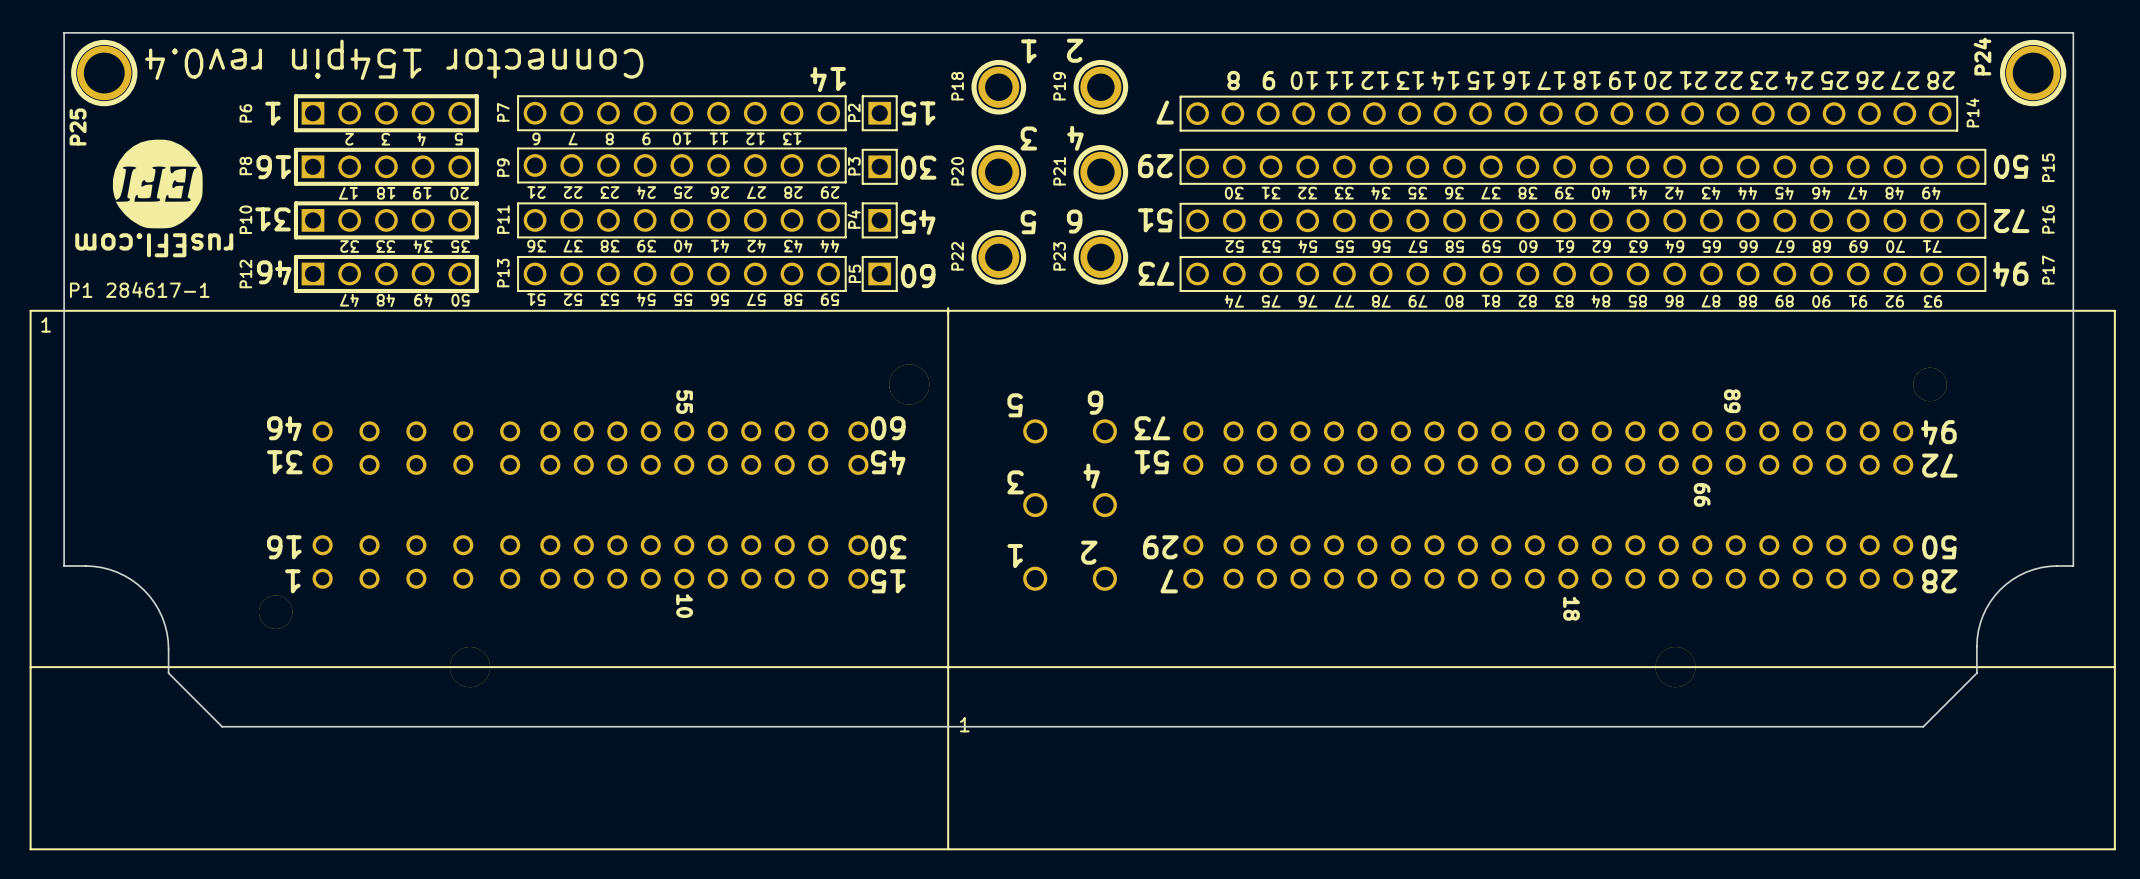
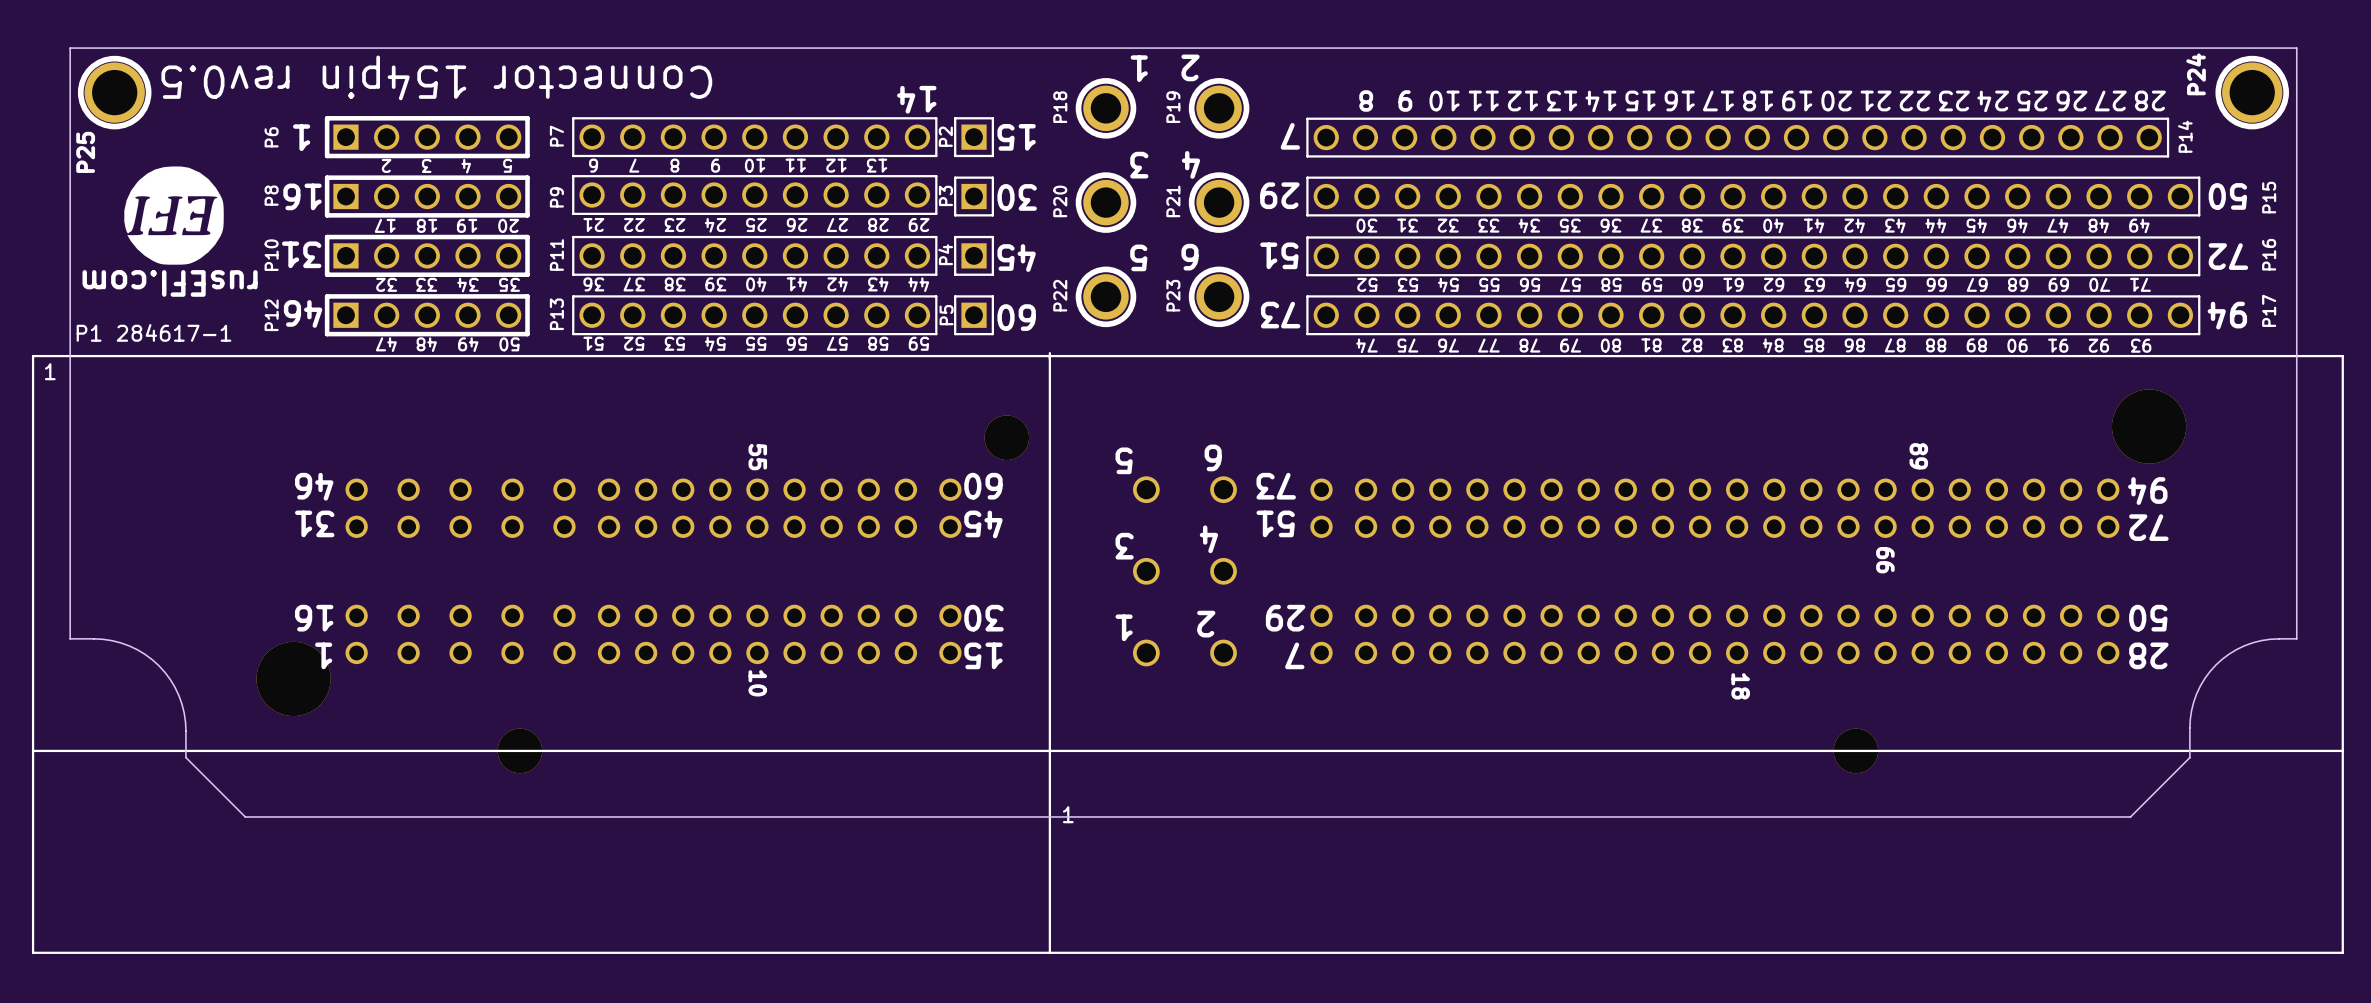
text: Connector 154pin rev0.4 (394, 59) -> Connector 154pin rev0.5 (436, 77)
P1 footprint: [29, 307, 2116, 851] -> [31, 352, 2344, 954]

